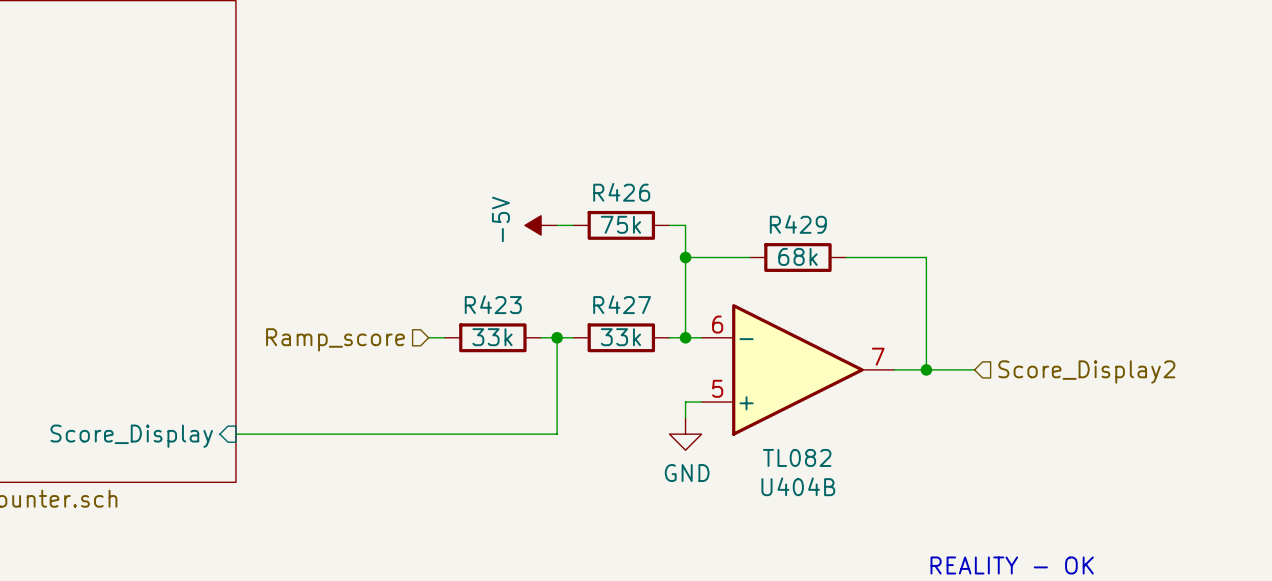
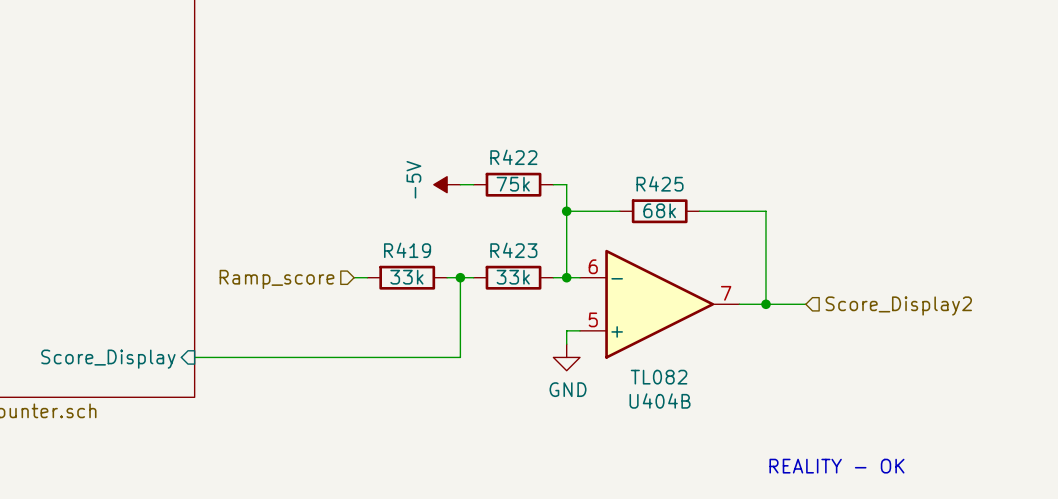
R426 name: R426 (621, 192) -> R422 (513, 157)
R429 name: R429 (798, 224) -> R425 (660, 183)
R423 name: R423 (493, 304) -> R419 (407, 250)
R427 name: R427 (622, 304) -> R423 (513, 250)

